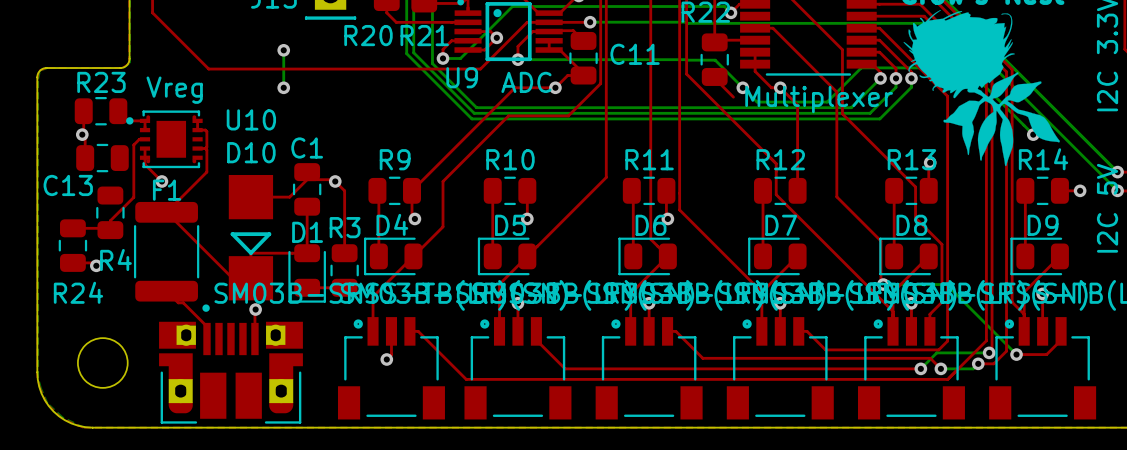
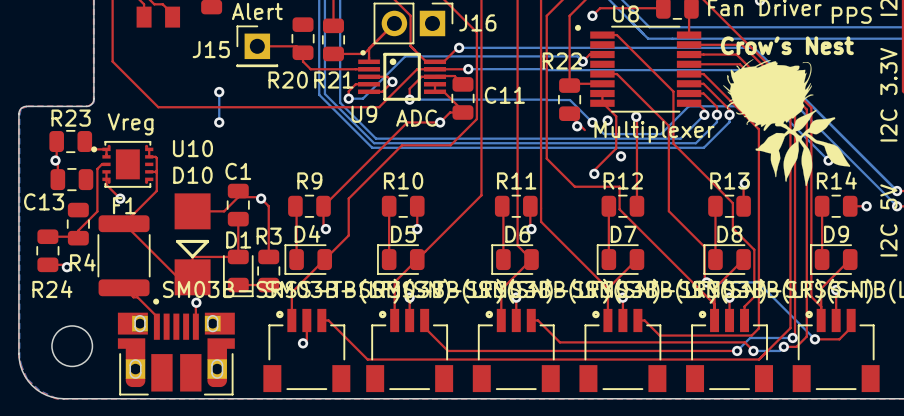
top track: (755, 64) (755, 71) (771, 87) (780, 87) (797, 105) -> (636, 116) (636, 136)
top track: none -> (602, 103) (616, 116) (616, 148) (594, 170) (594, 173)
top track: (686, 74) (776, 163) (776, 166) -> (546, 111) (546, 158) (574, 186) (619, 186)
via: none -> (636, 116)
via: none -> (607, 120)
via: (780, 87) -> none
via: none -> (577, 126)
via: none -> (621, 156)
via: none -> (594, 173)

